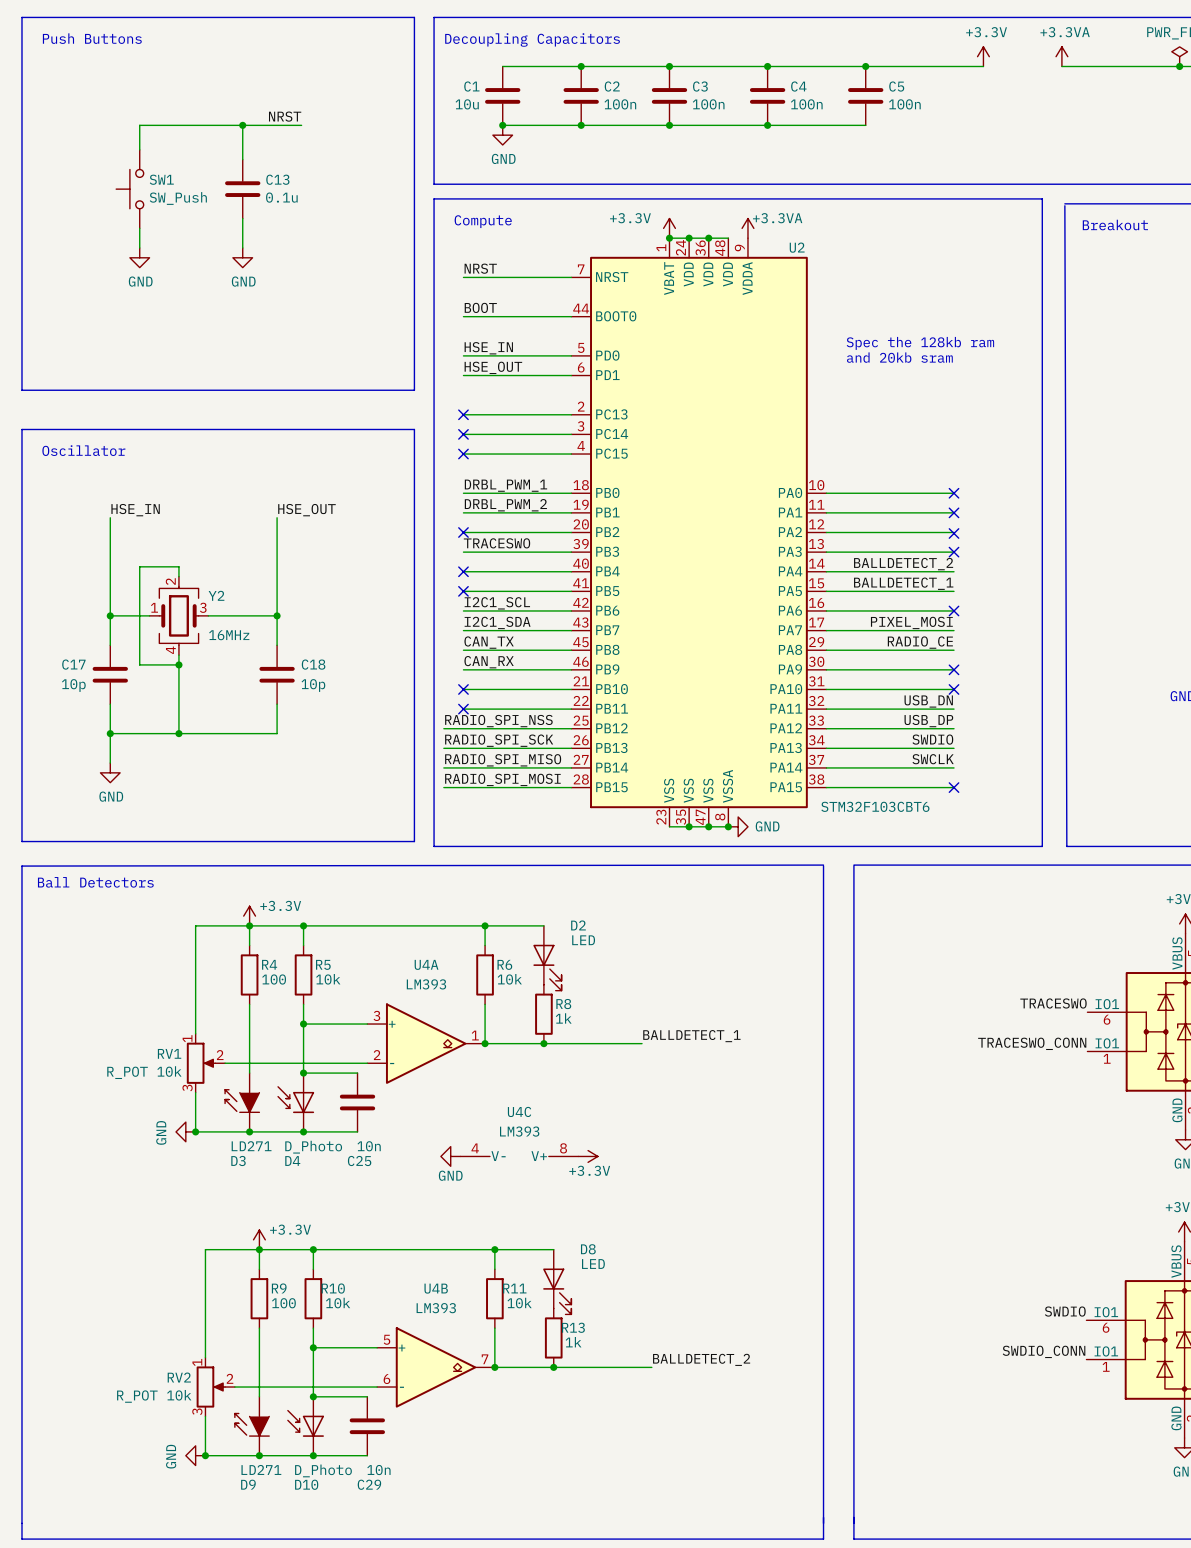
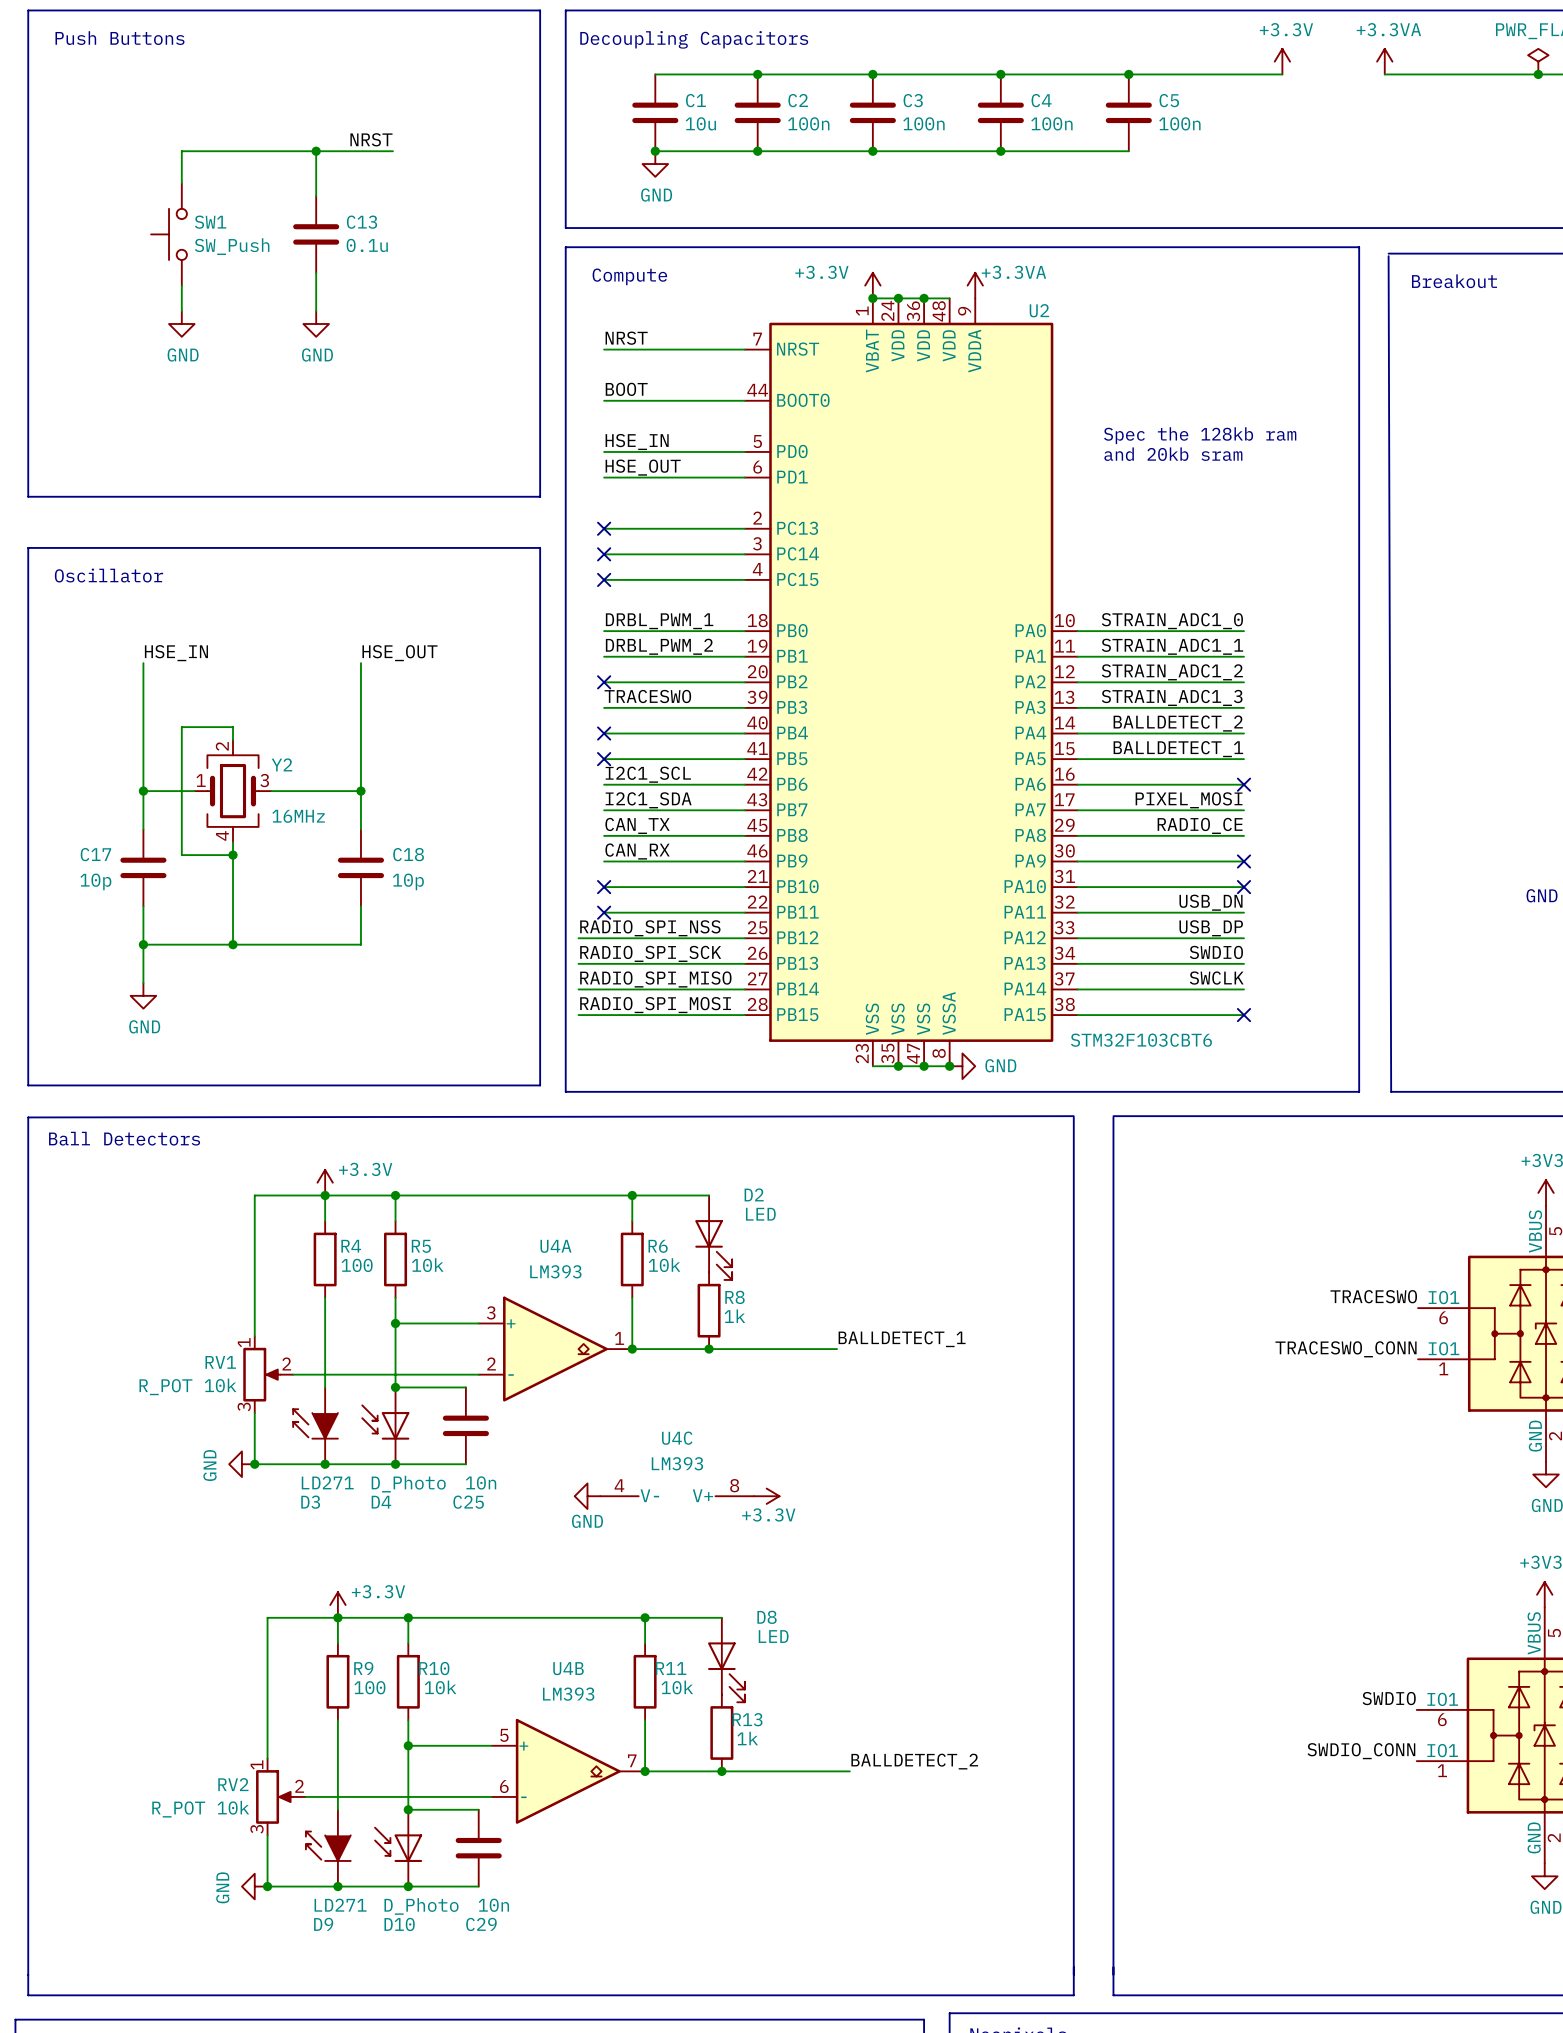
C1 name position: C1 (471, 86) -> C1 (695, 100)
C1 value position: 10u (467, 104) -> 10u (700, 123)
label: none -> STRAIN_ADC1_0 (1172, 621)
no-connect mark: (954, 493) -> none
label: none -> STRAIN_ADC1_1 (1172, 646)
no-connect mark: (954, 512) -> none
label: none -> STRAIN_ADC1_2 (1172, 672)
no-connect mark: (954, 533) -> none
label: none -> STRAIN_ADC1_3 (1172, 697)
no-connect mark: (954, 552) -> none

